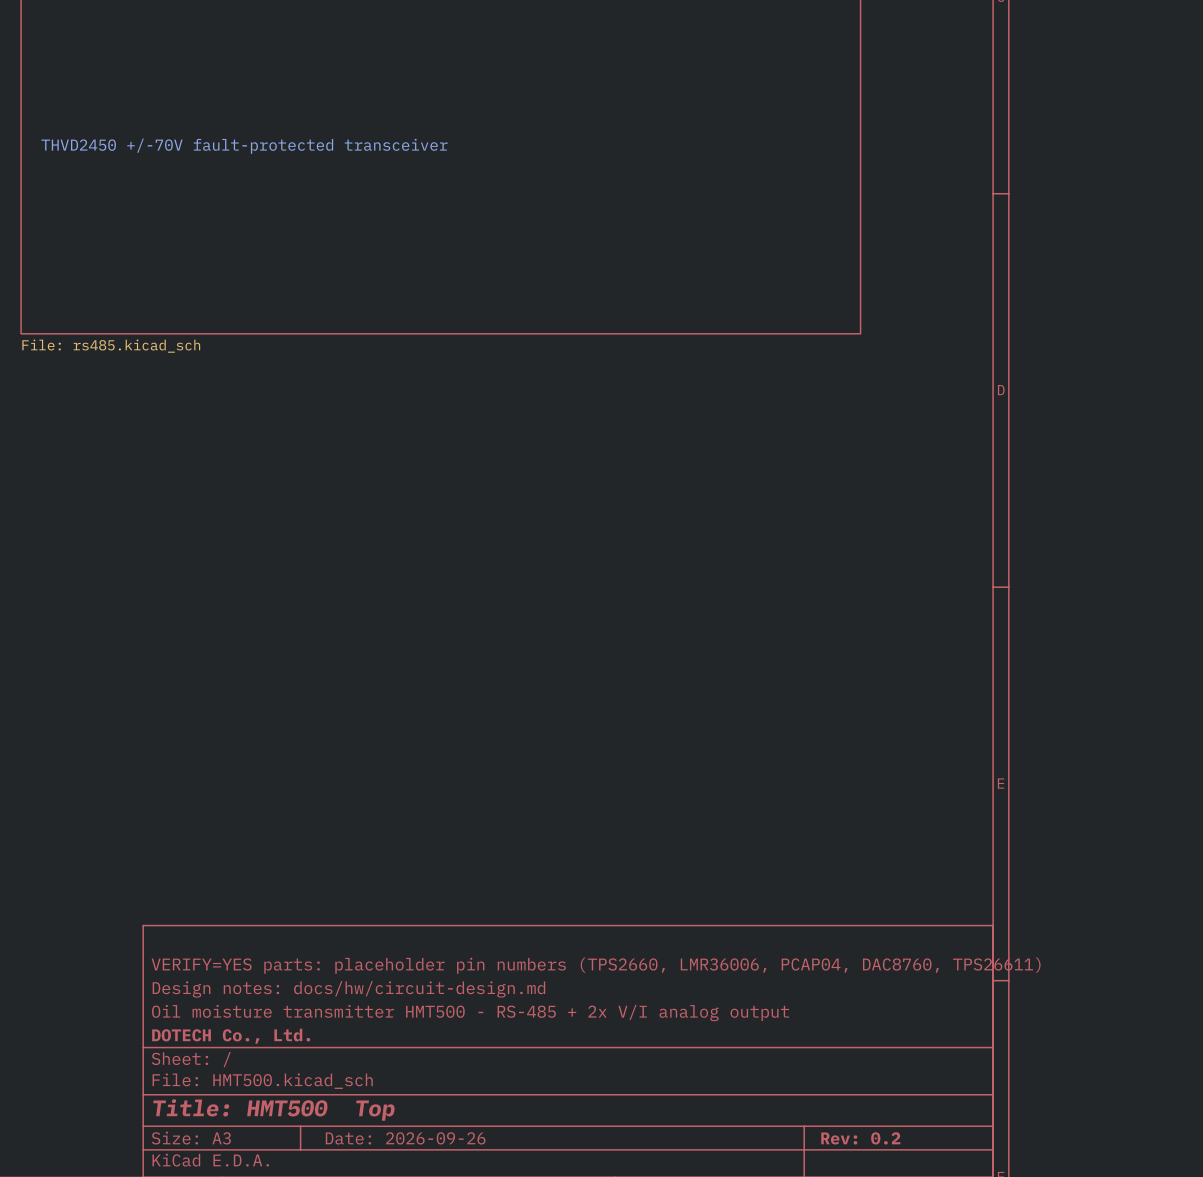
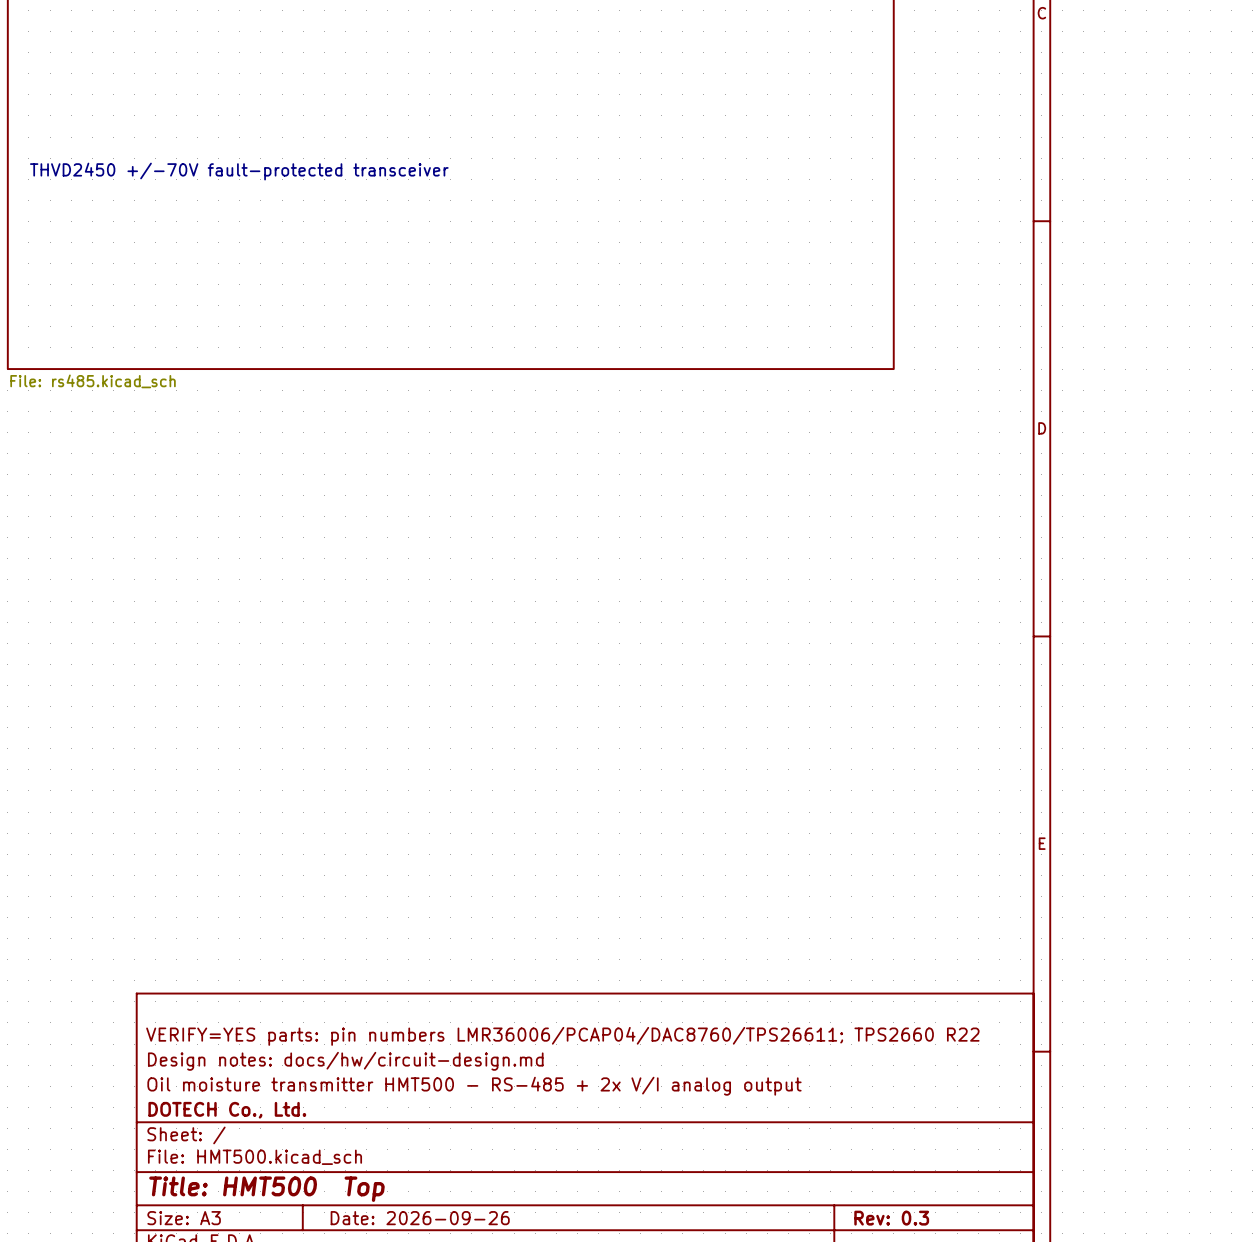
title block: VERIFY=YES parts: placeholder pin numbers (TPS2660, LMR36006, PCAP04, DAC8760, TPS26611) (596, 965) -> VERIFY=YES parts: pin numbers LMR36006/PCAP04/DAC8760/TPS26611; TPS2660 R22 (562, 1036)
title block: Rev: 0.2 (860, 1138) -> Rev: 0.3 (891, 1218)

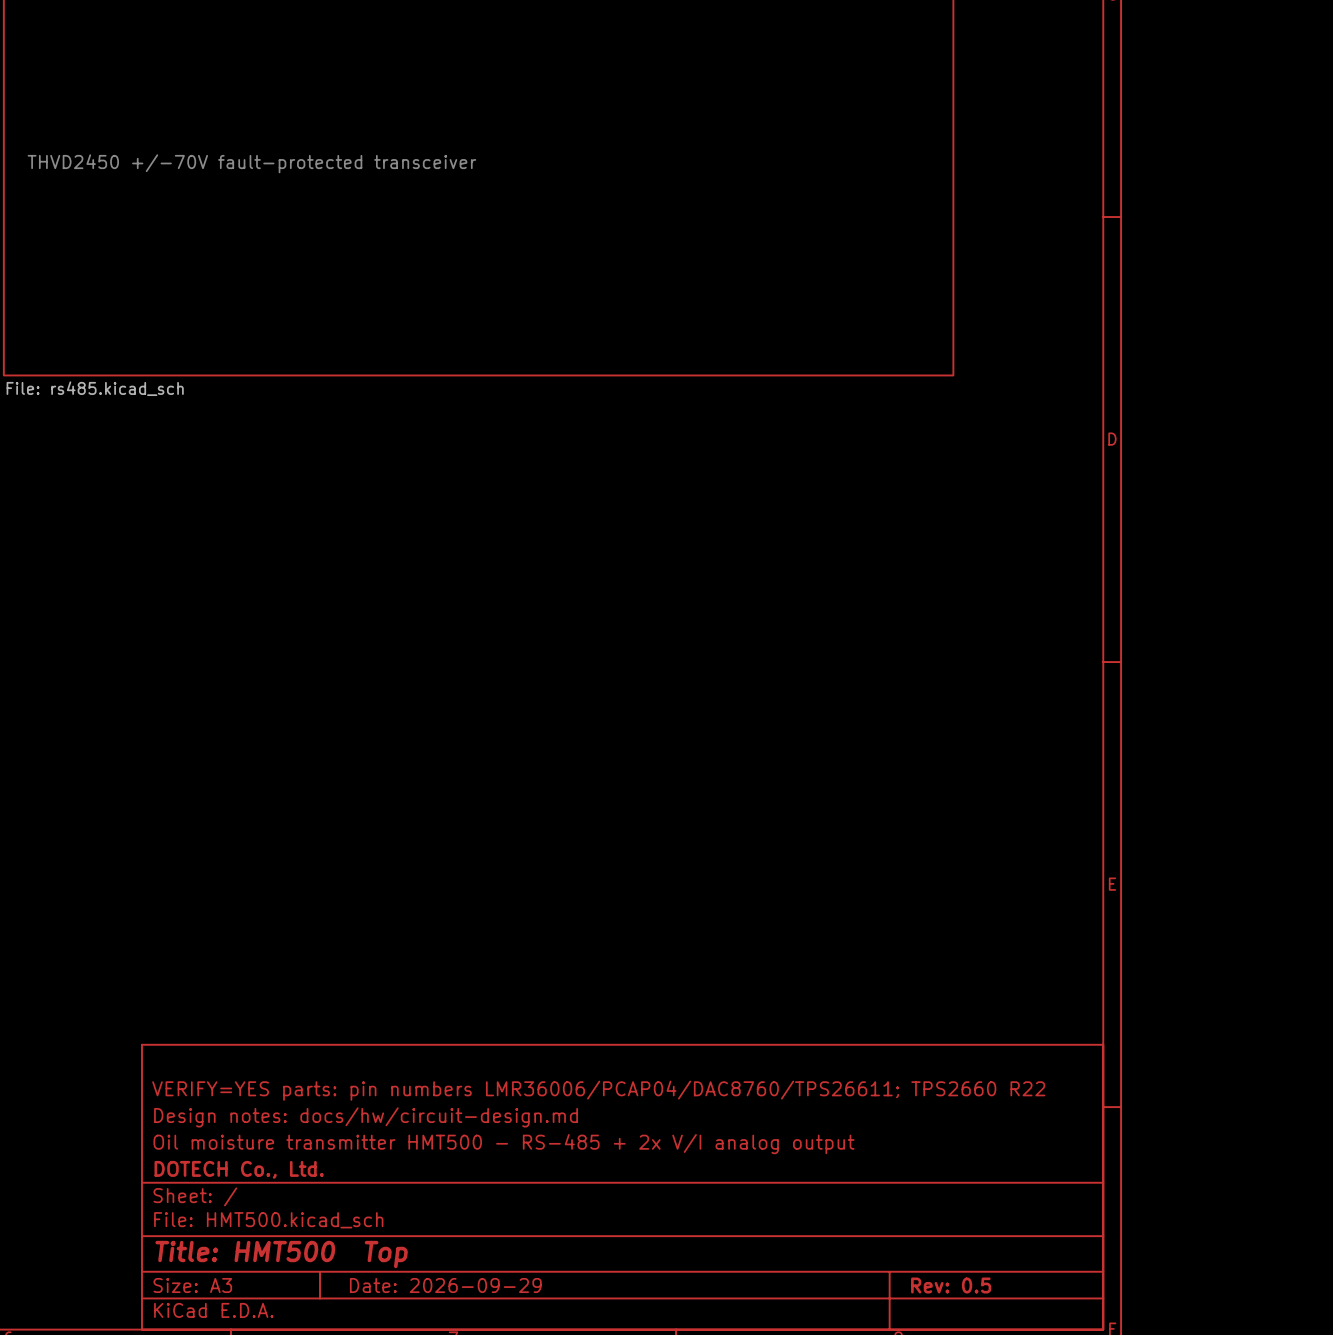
title block: Date: 2026-09-26 (420, 1218) -> Date: 2026-09-29 (445, 1285)
title block: Rev: 0.3 (891, 1218) -> Rev: 0.5 (951, 1285)

